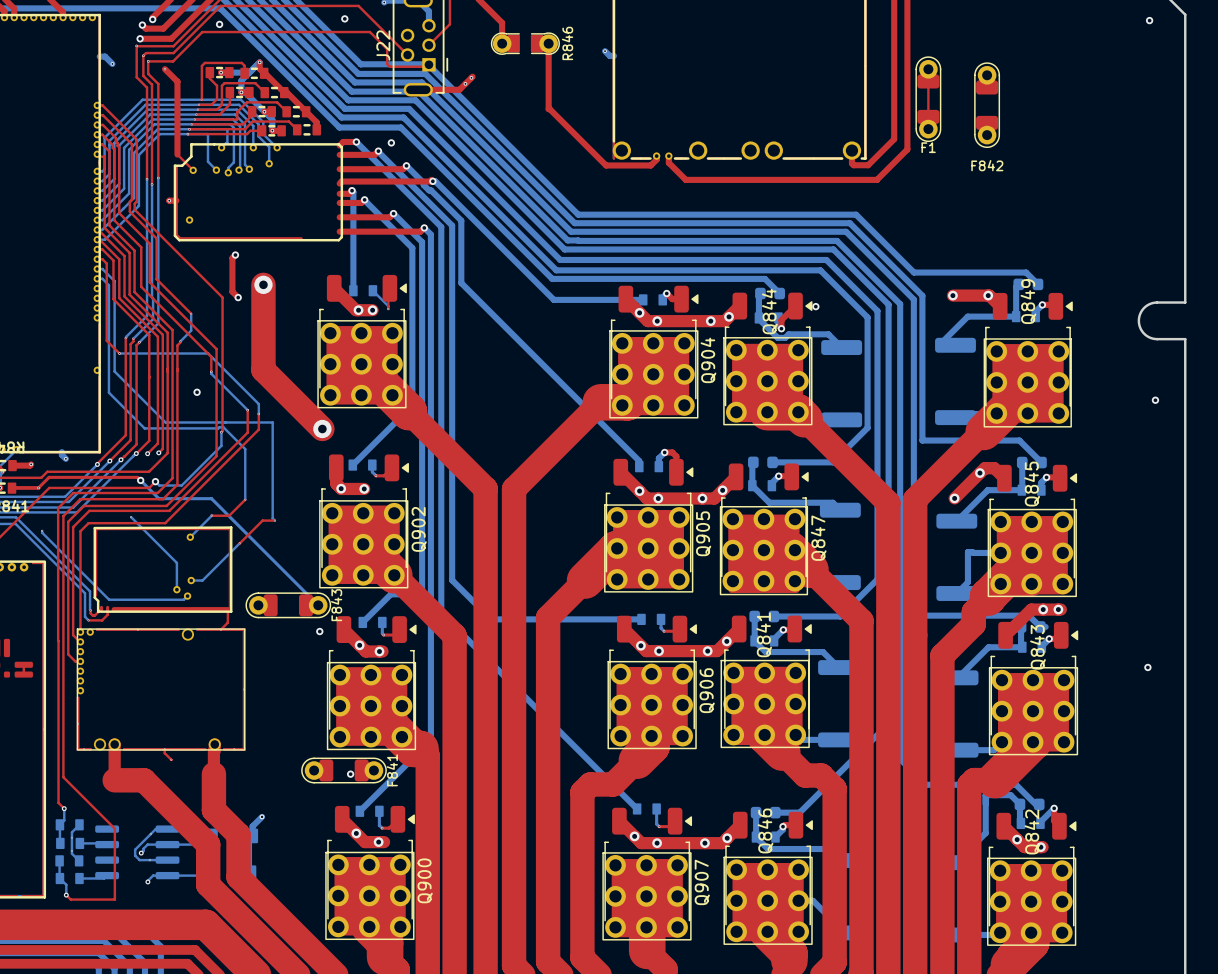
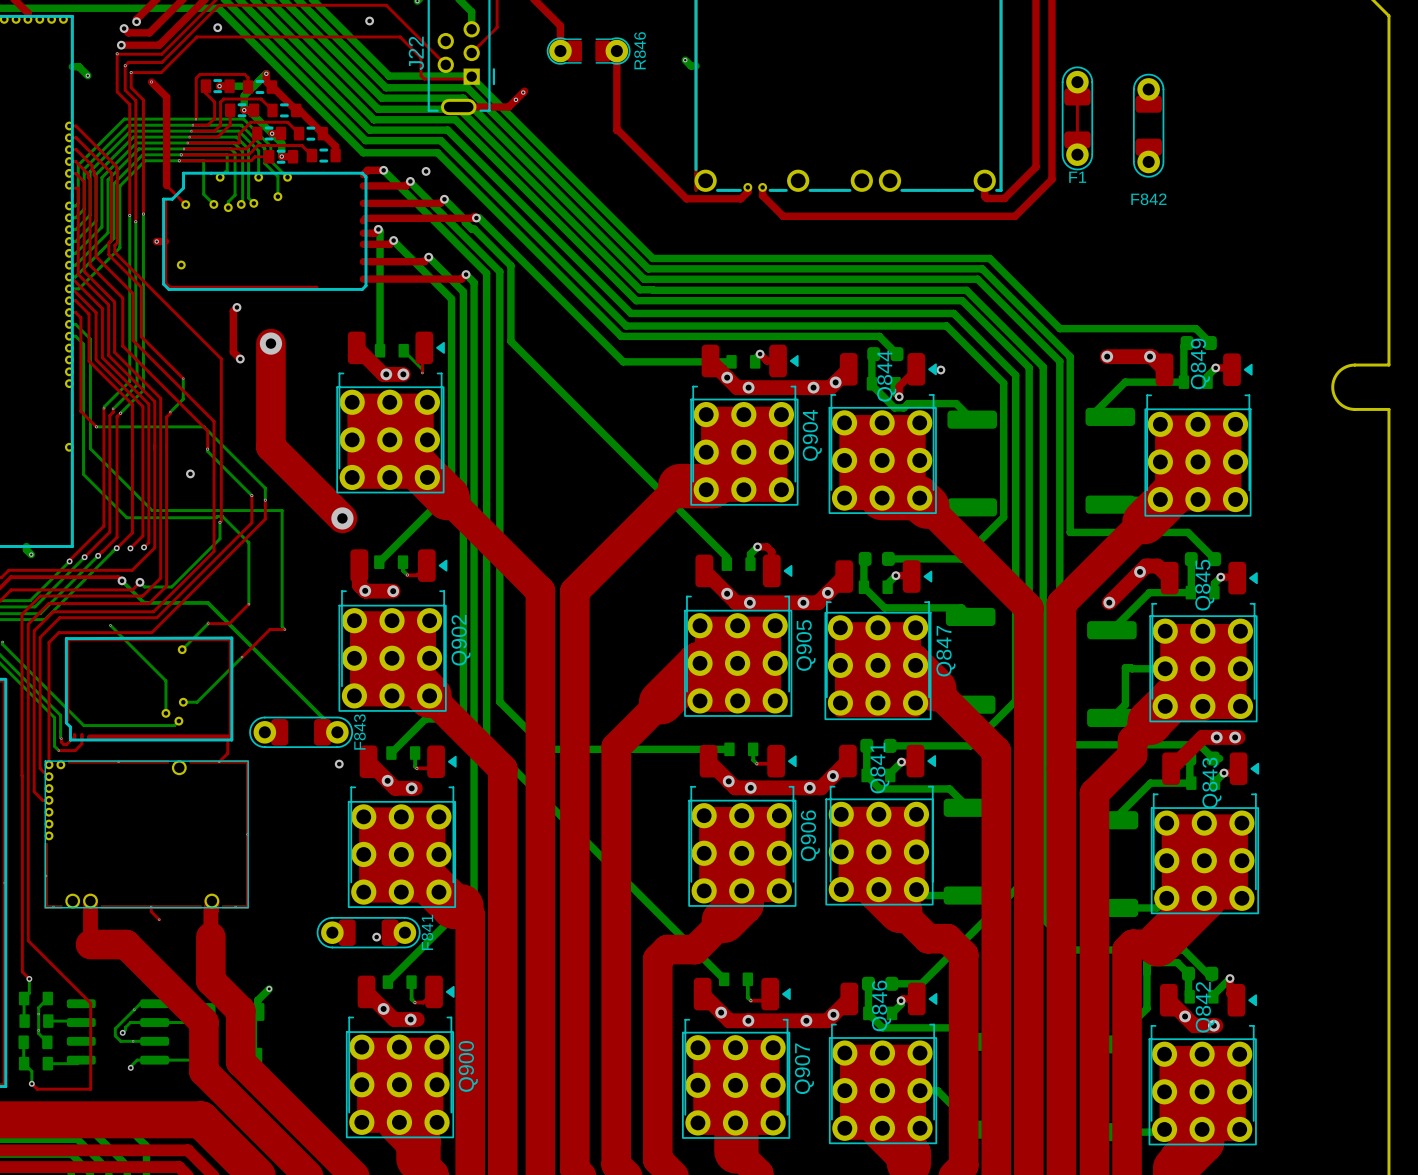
via: (1149, 20) -> none
via: (1155, 400) -> none
via: (1147, 667) -> none

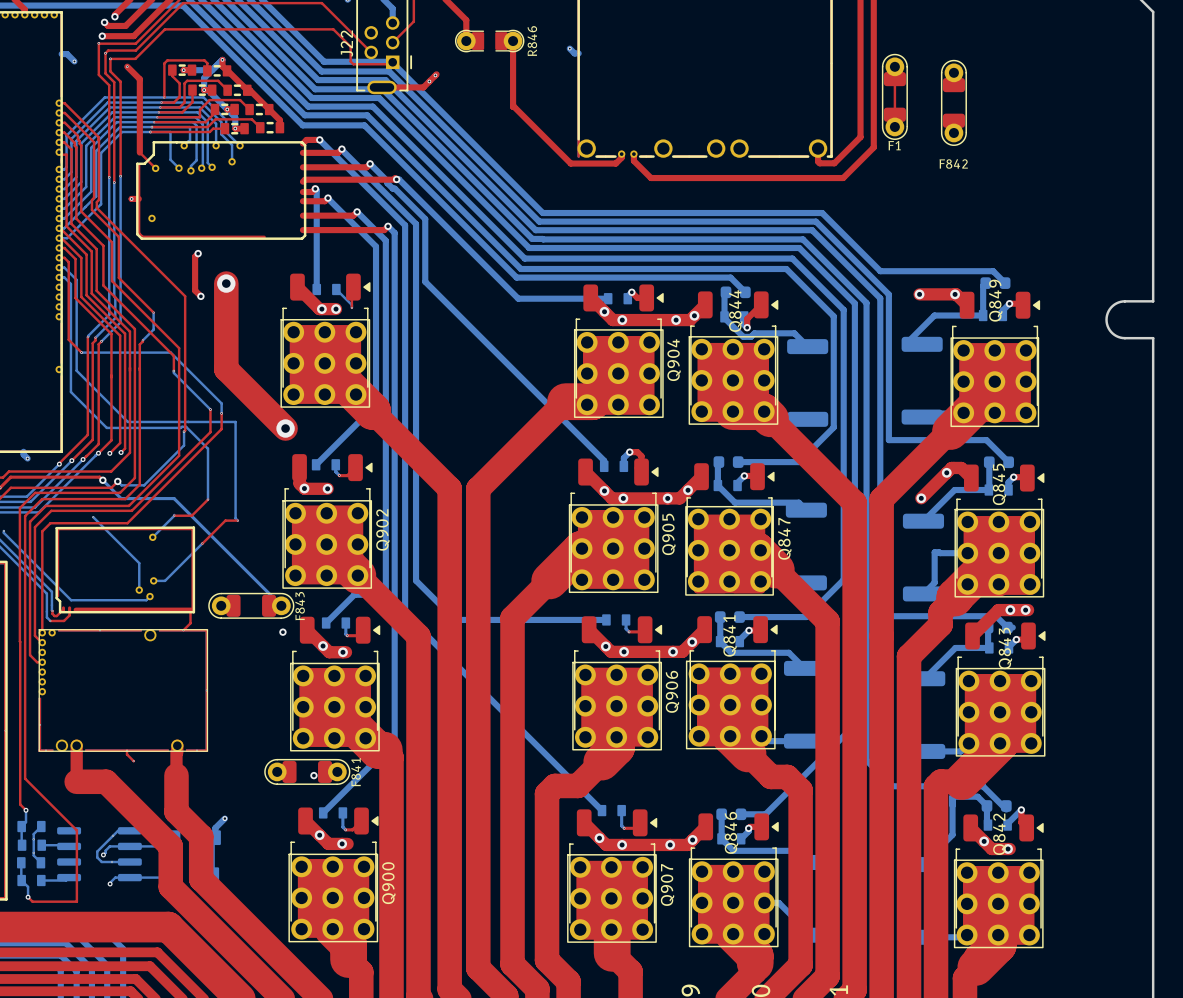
via: (369, 21) -> none
via: (217, 27) -> none
via: (426, 171) -> none
via: (940, 370) -> none
via: (190, 473) -> none

